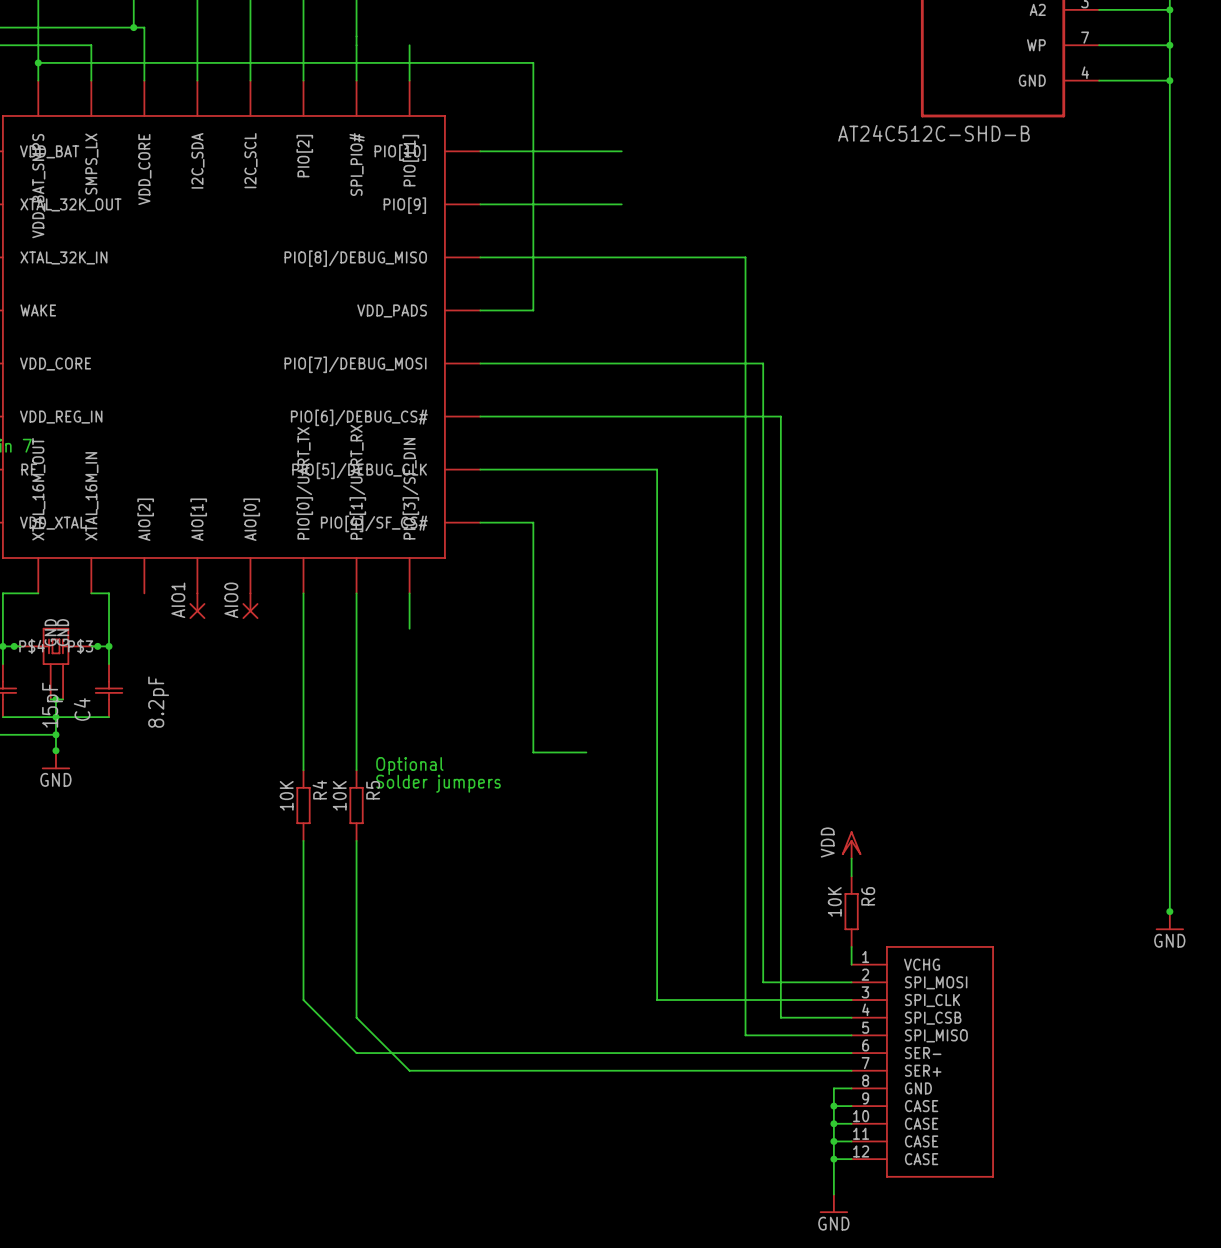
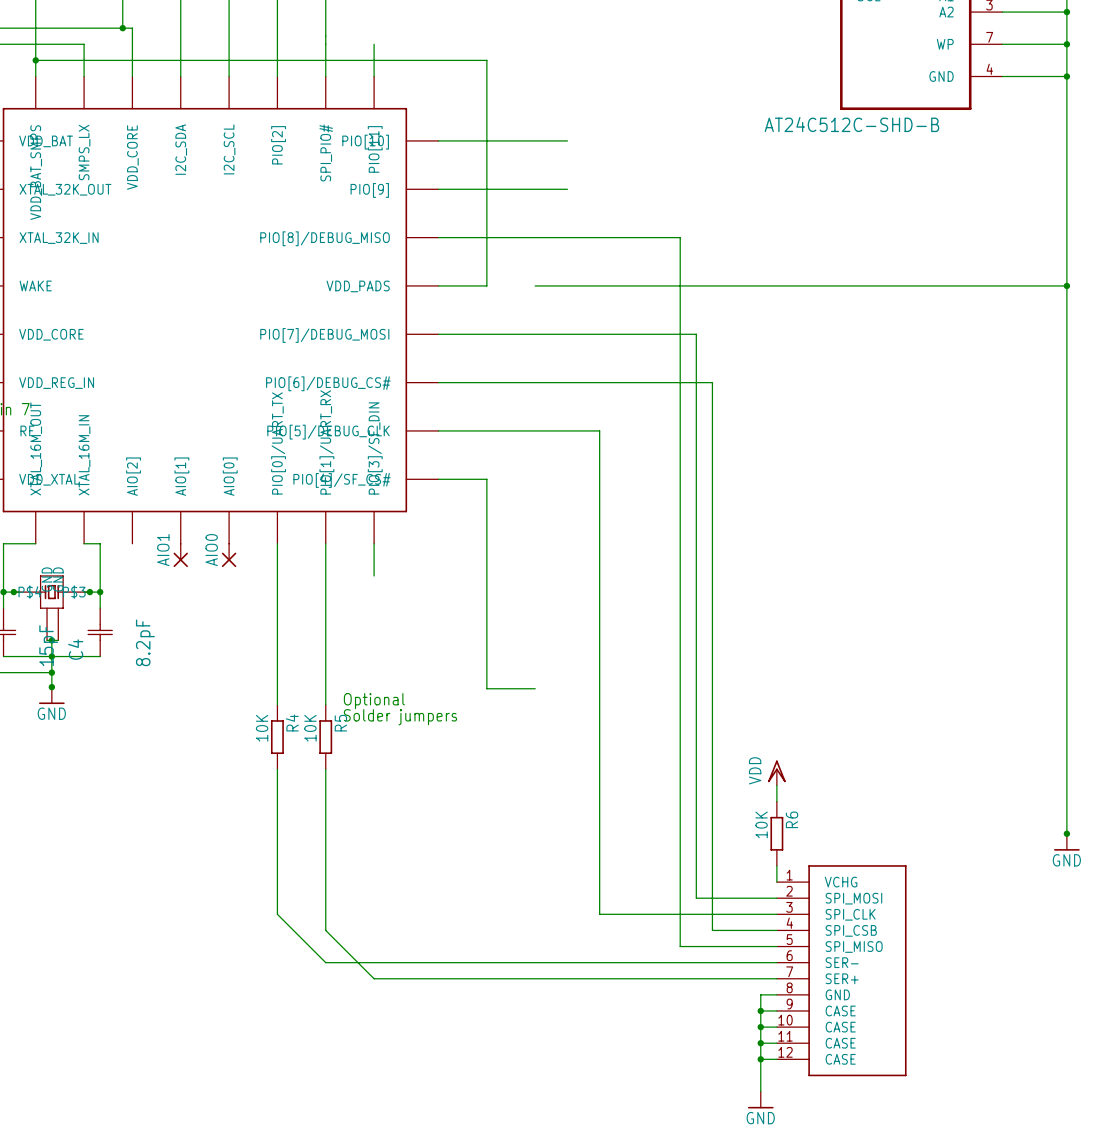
wire: none -> (535, 285) (1066, 285)
junction: none -> (1066, 285)

